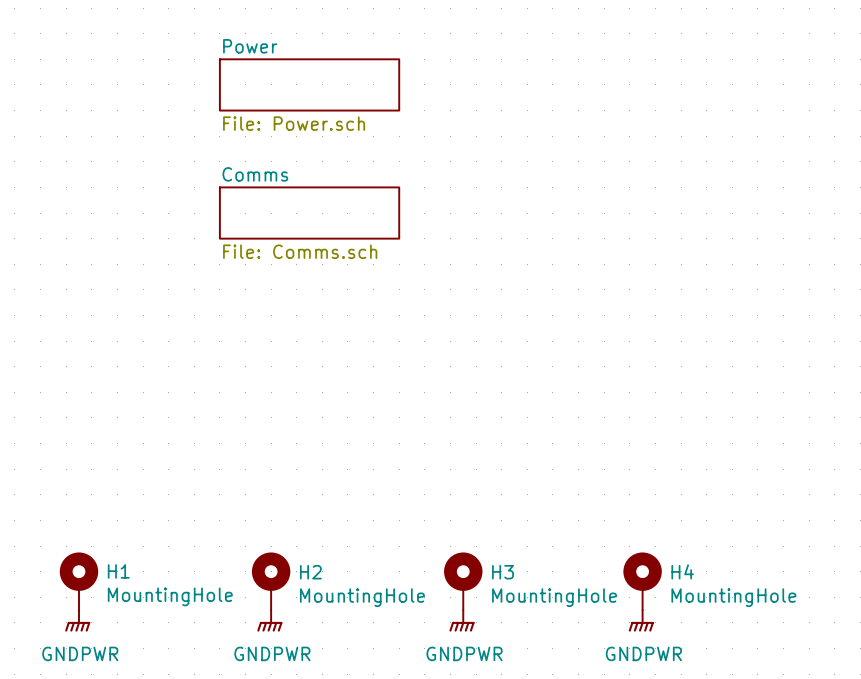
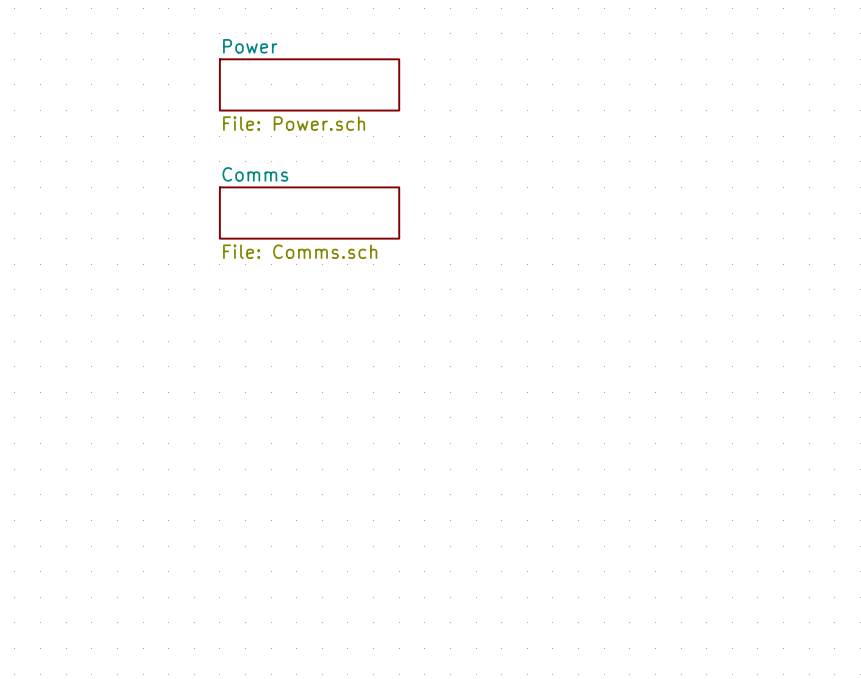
H1: MountingHole (78, 581) -> none
H2: MountingHole (271, 581) -> none
H3: MountingHole (463, 581) -> none
H4: MountingHole (642, 581) -> none
power symbol: GNDPWR (77, 620) -> none
power symbol: GNDPWR (269, 620) -> none
power symbol: GNDPWR (461, 620) -> none
power symbol: GNDPWR (641, 620) -> none

